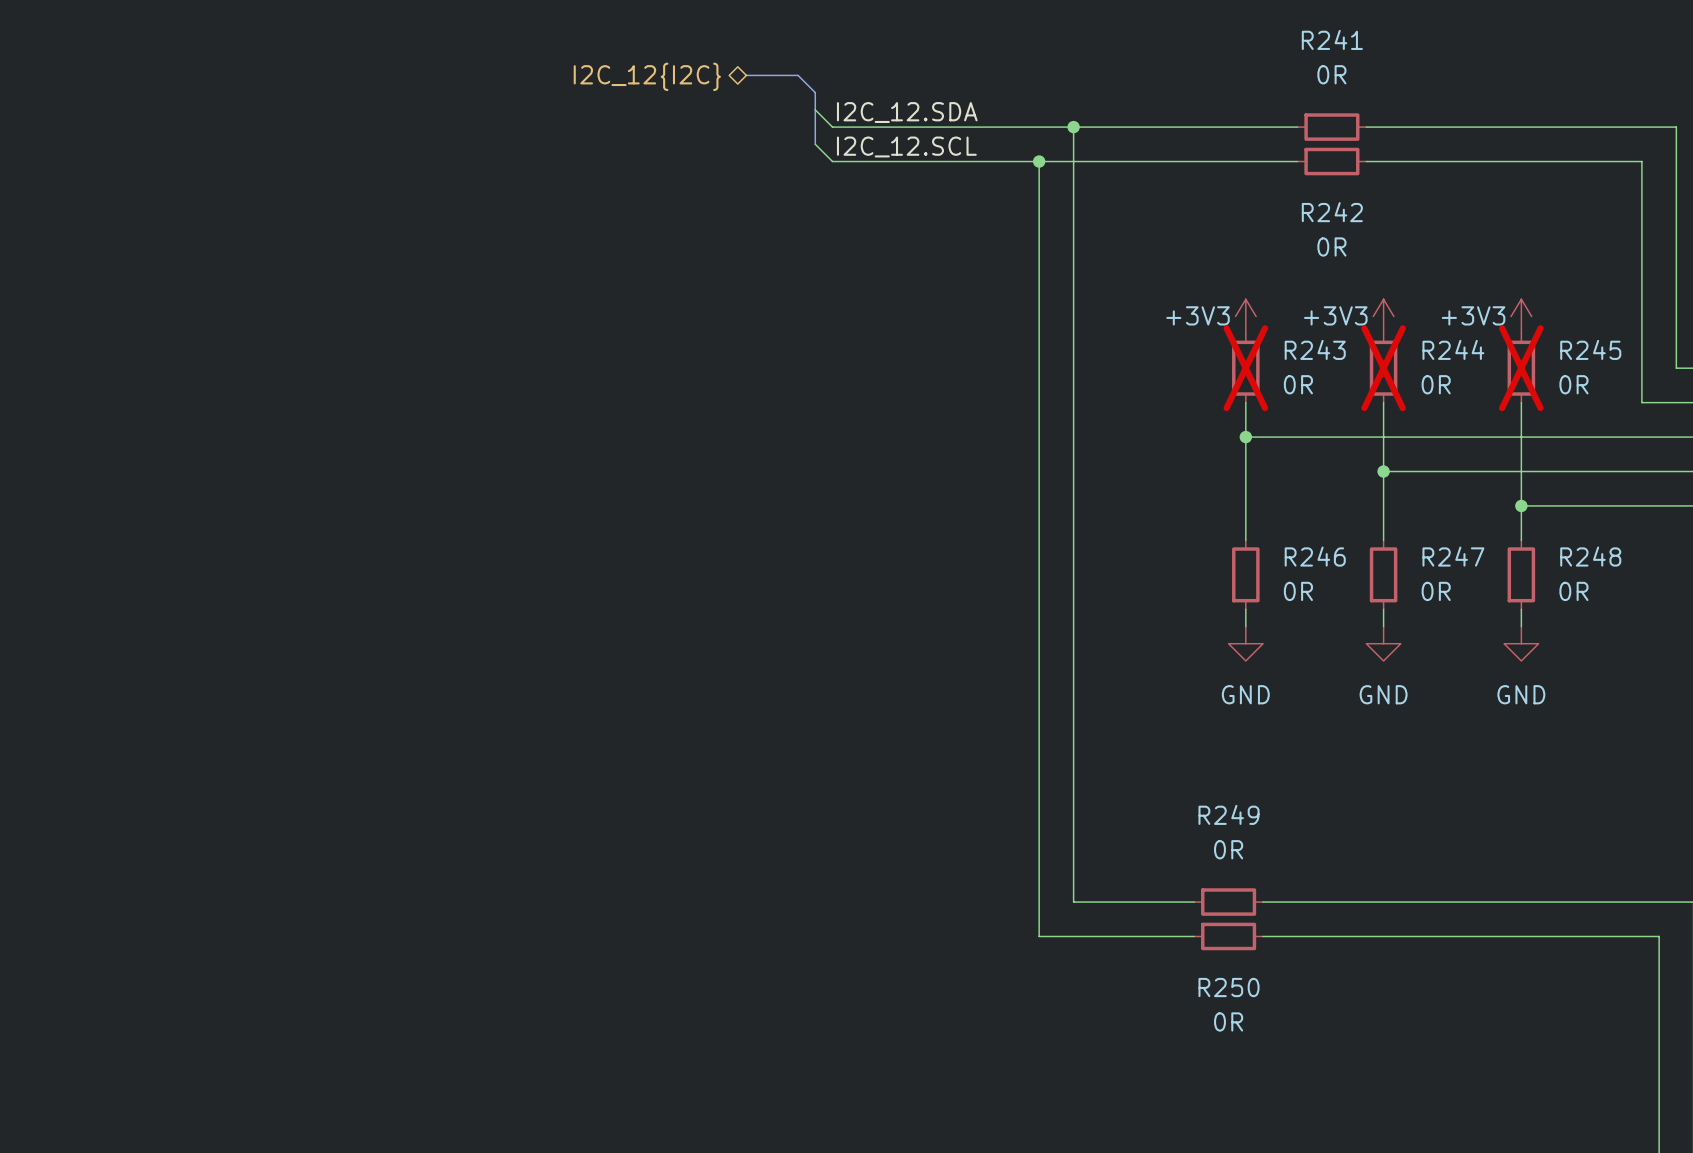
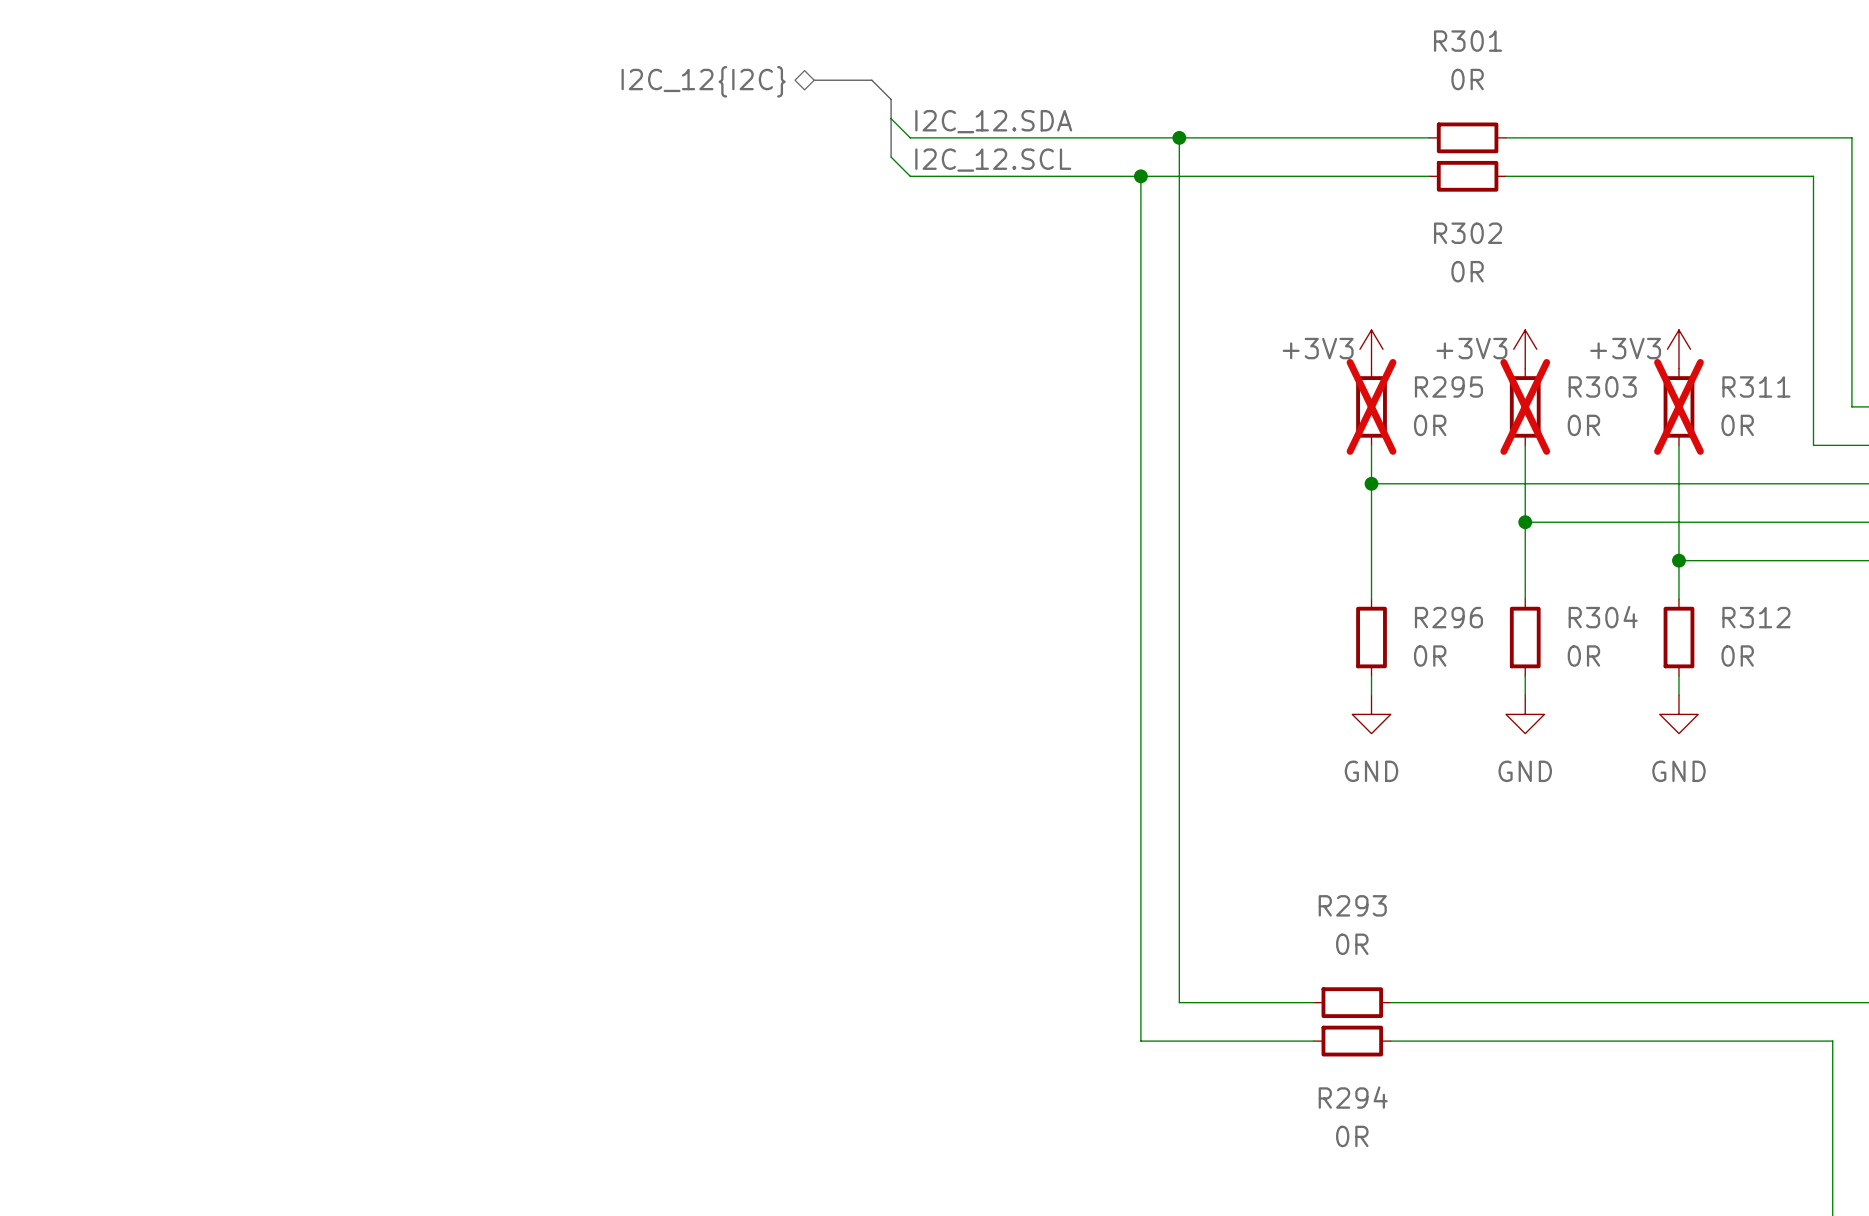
R241 name: R241 (1332, 39) -> R301 (1468, 41)
R242 name: R242 (1332, 212) -> R302 (1468, 233)
R243 name: R243 (1315, 349) -> R295 (1448, 386)
R244 name: R244 (1453, 349) -> R303 (1602, 386)
R245 name: R245 (1590, 349) -> R311 (1756, 386)
R246 name: R246 (1315, 556) -> R296 (1448, 617)
R247 name: R247 (1453, 556) -> R304 (1603, 617)
R248 name: R248 (1590, 556) -> R312 (1756, 617)
R249 name: R249 (1229, 814) -> R293 (1352, 905)
R250 name: R250 (1229, 987) -> R294 (1353, 1097)

